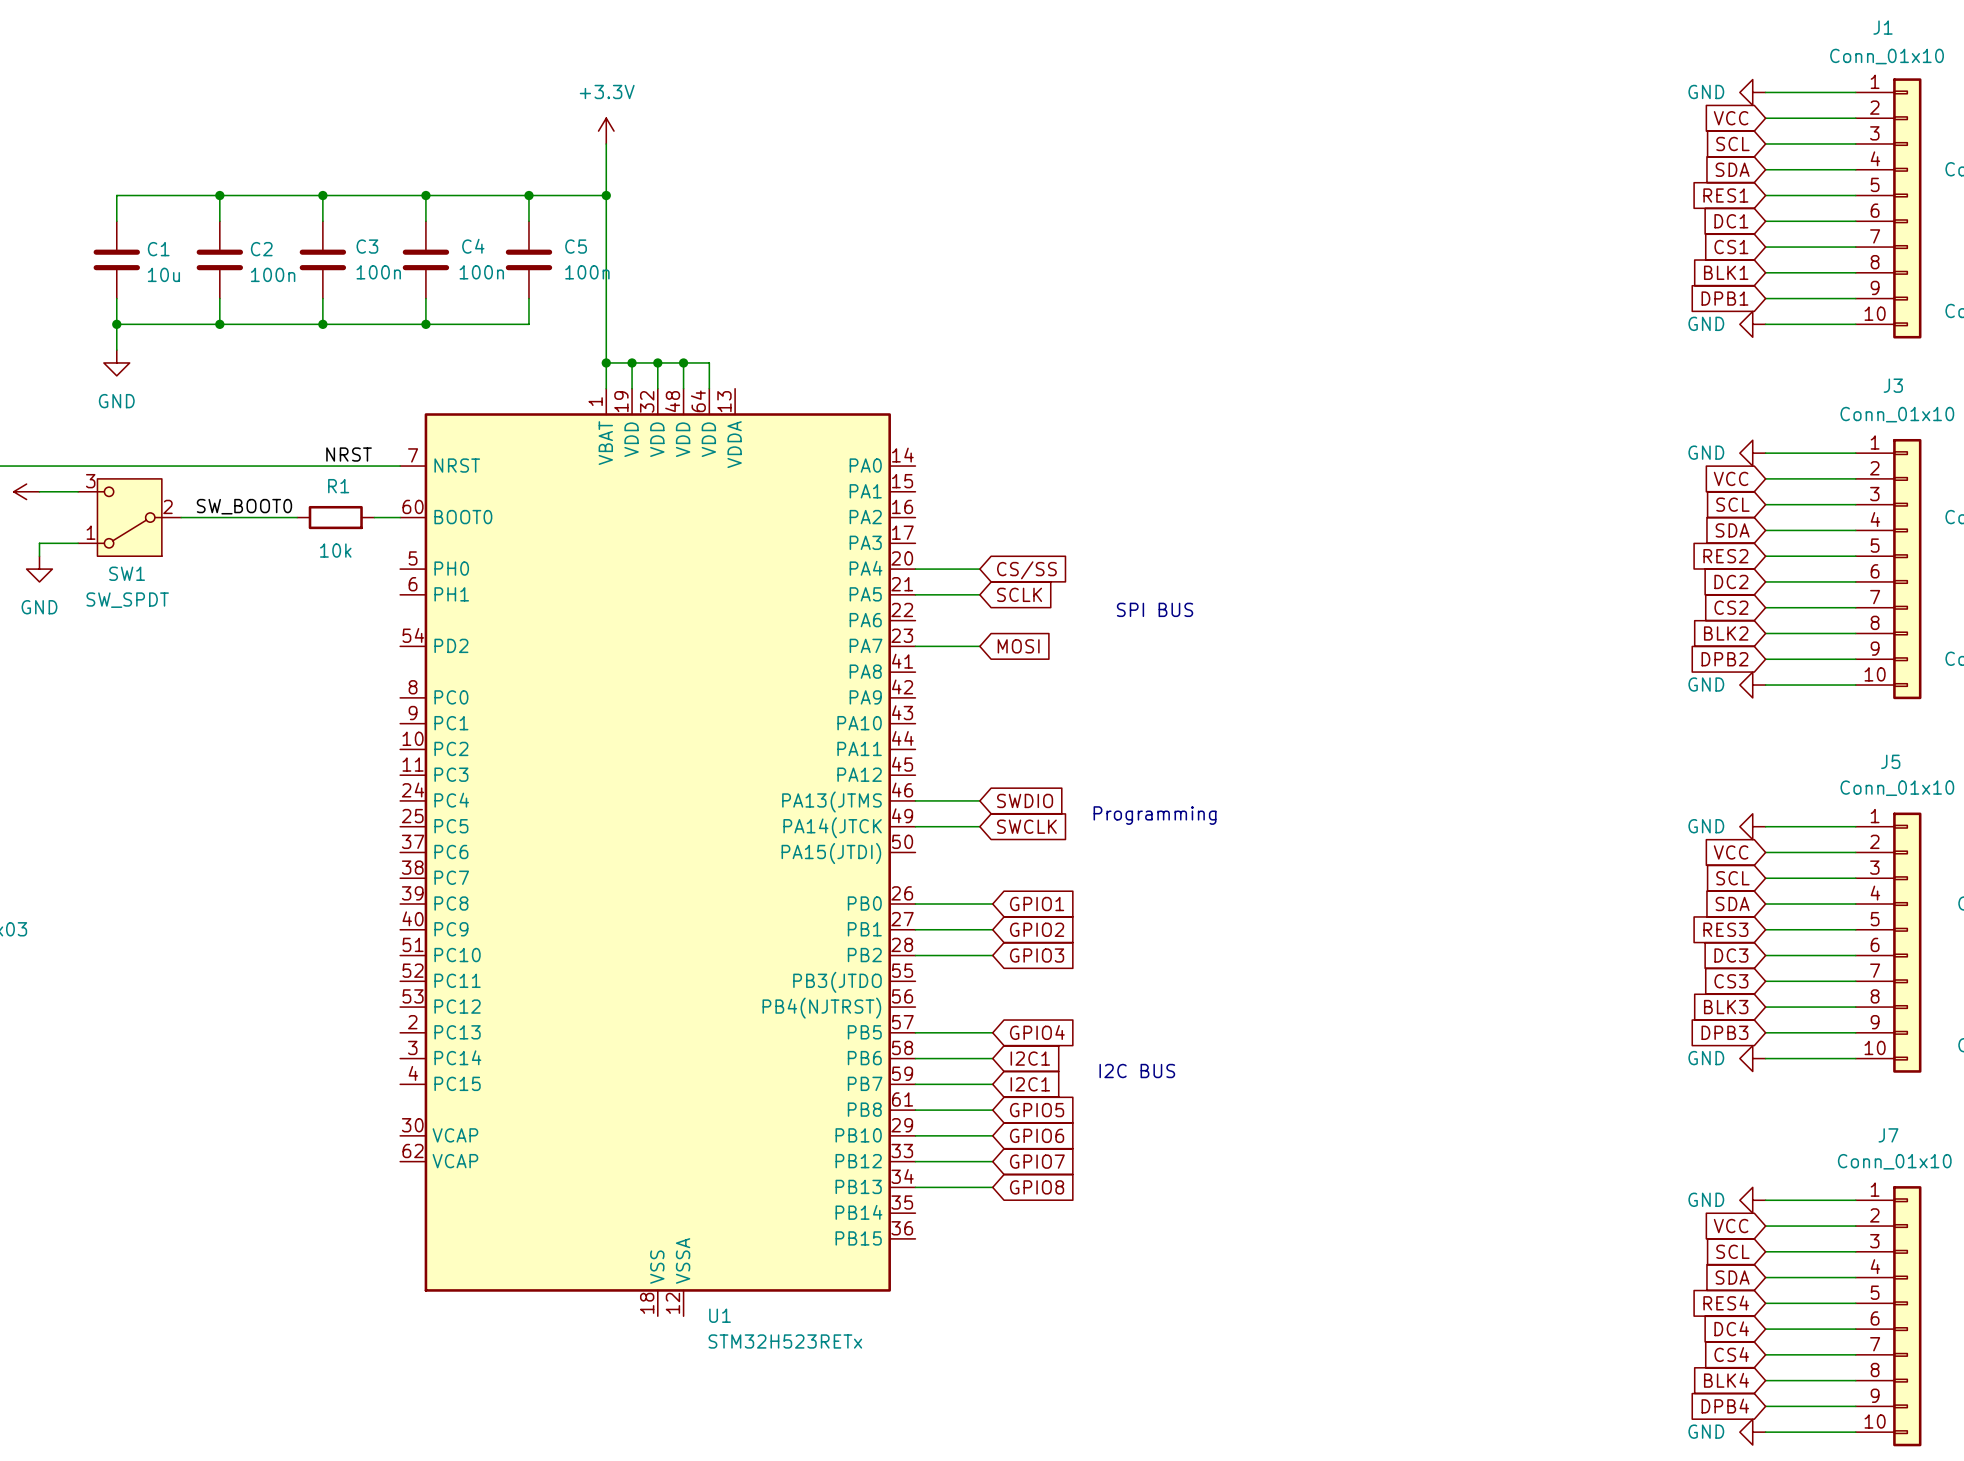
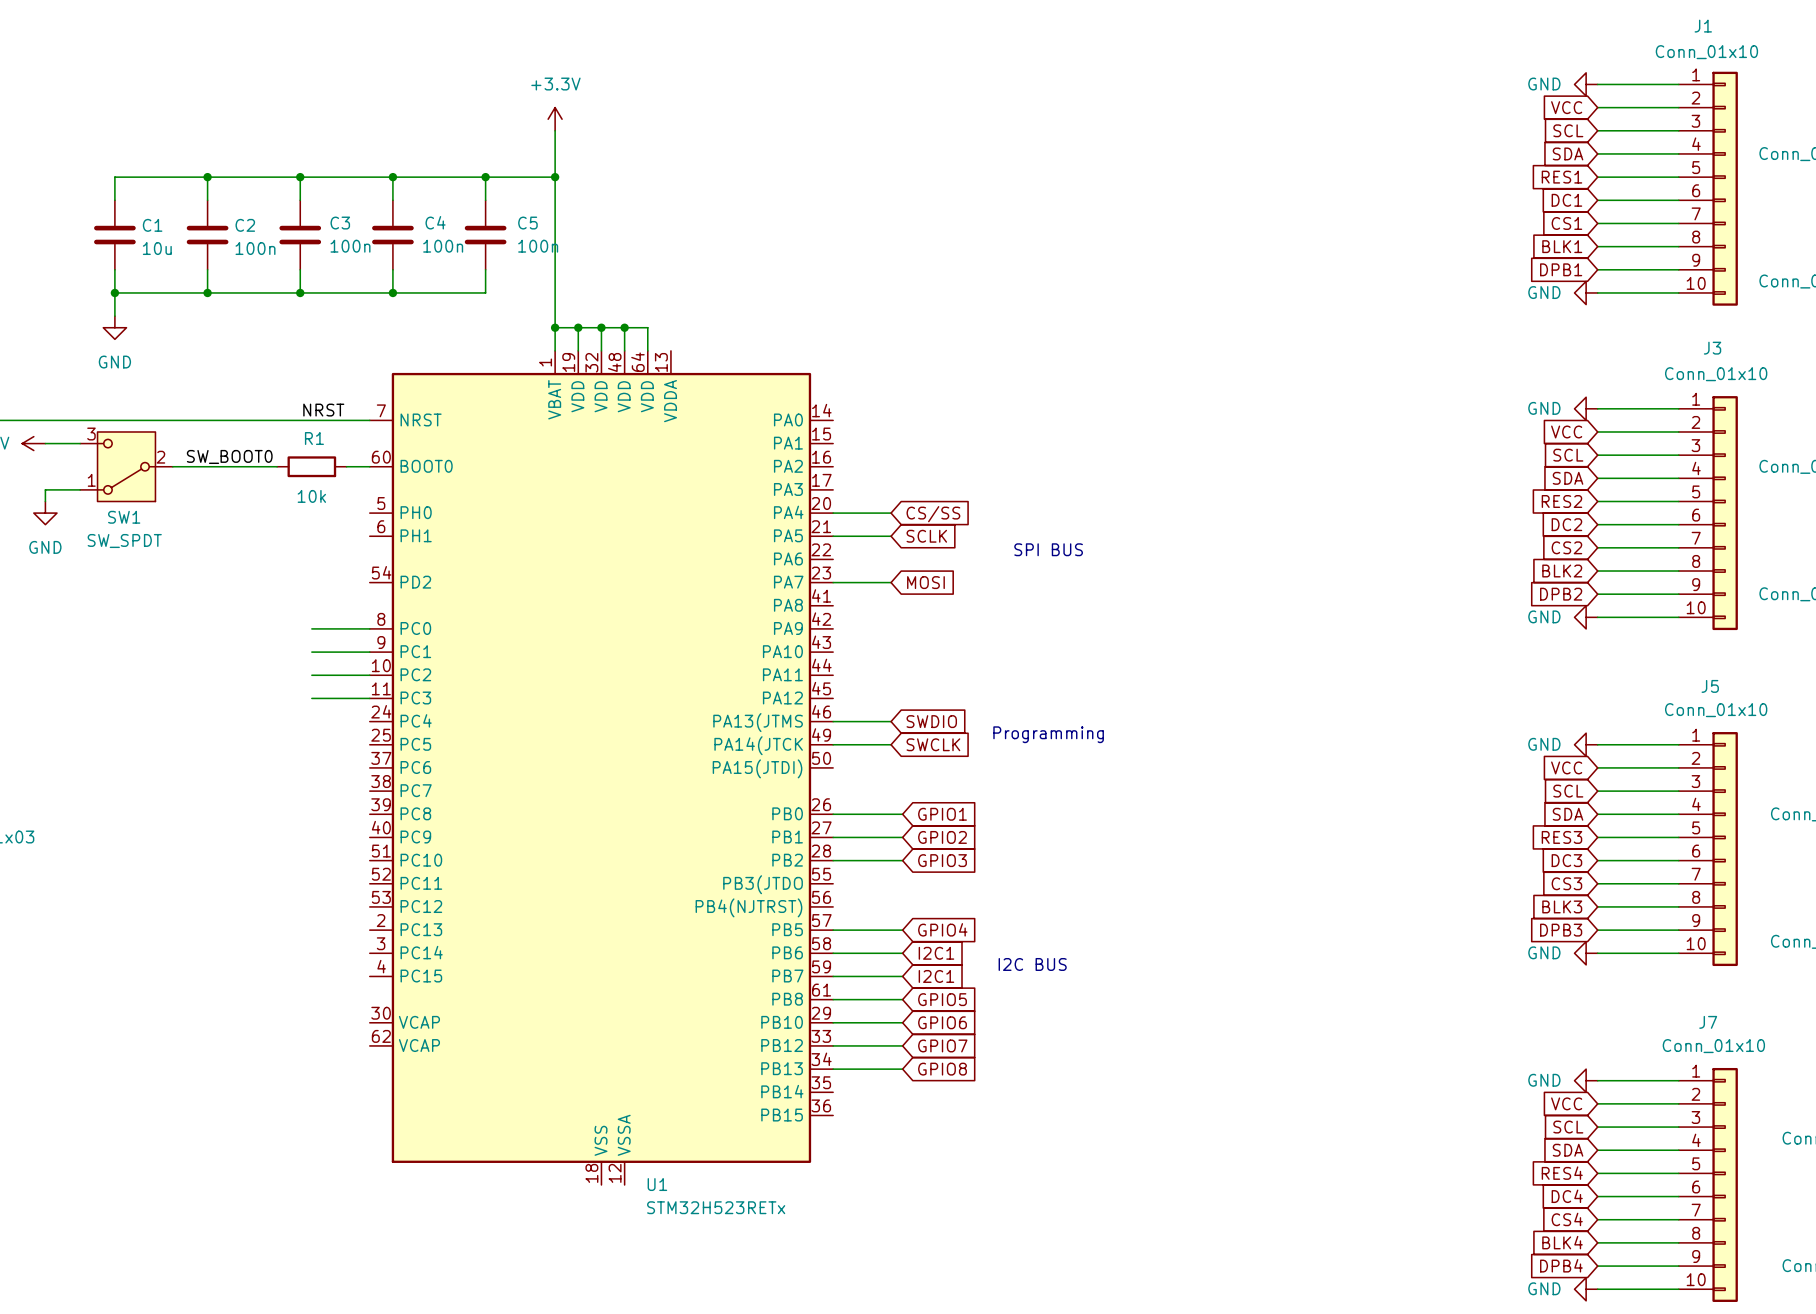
wire: none -> (311, 628) (369, 628)
wire: none -> (311, 652) (369, 652)
wire: none -> (311, 675) (369, 675)
wire: none -> (311, 698) (369, 698)

